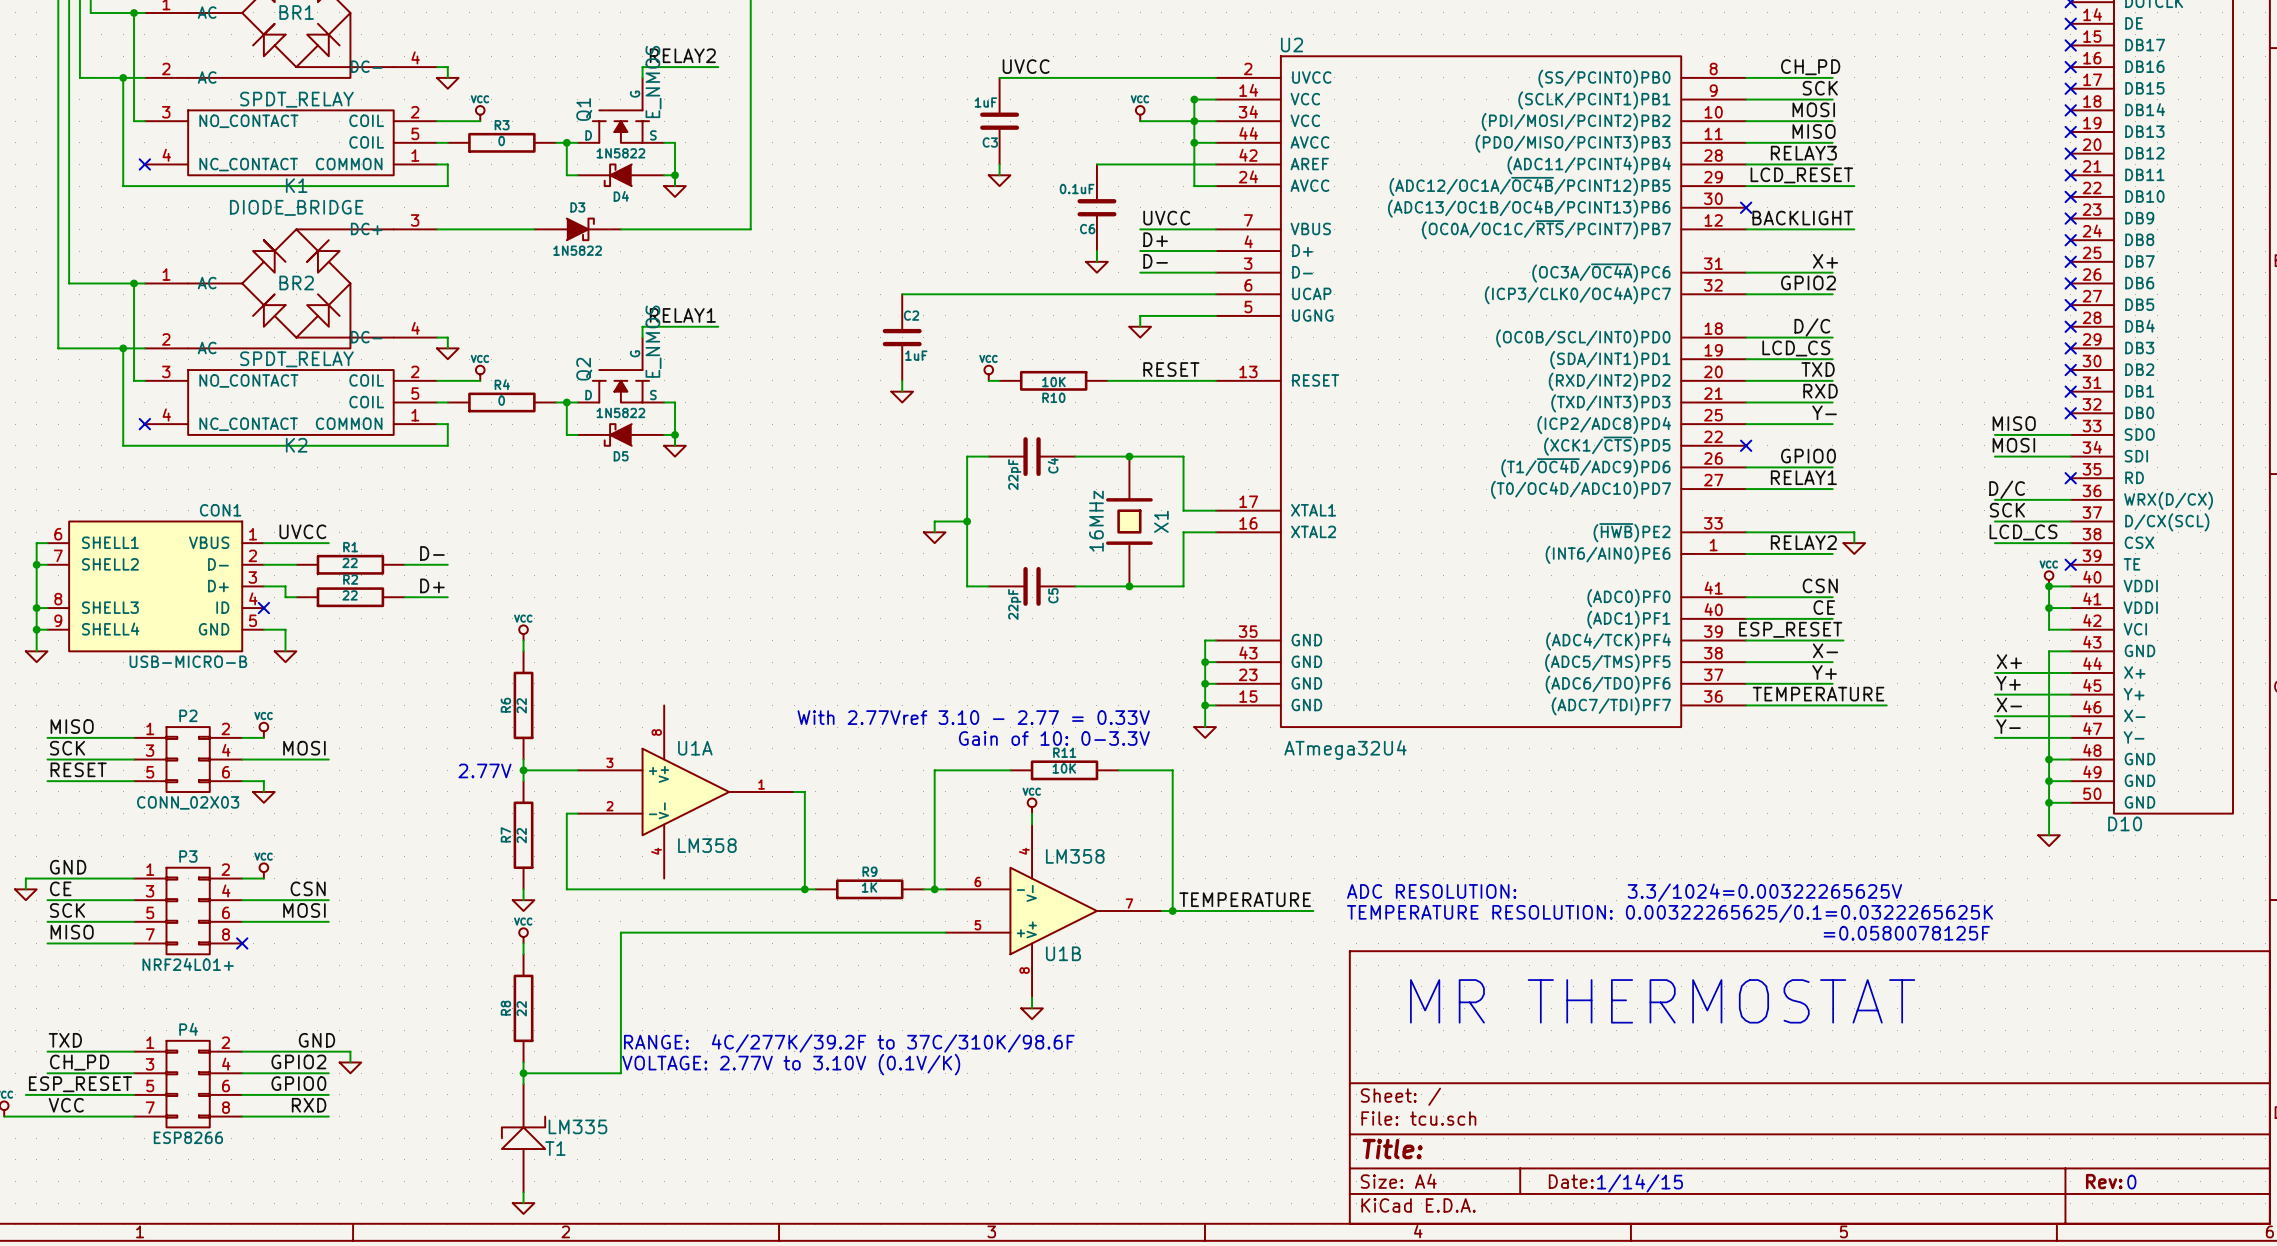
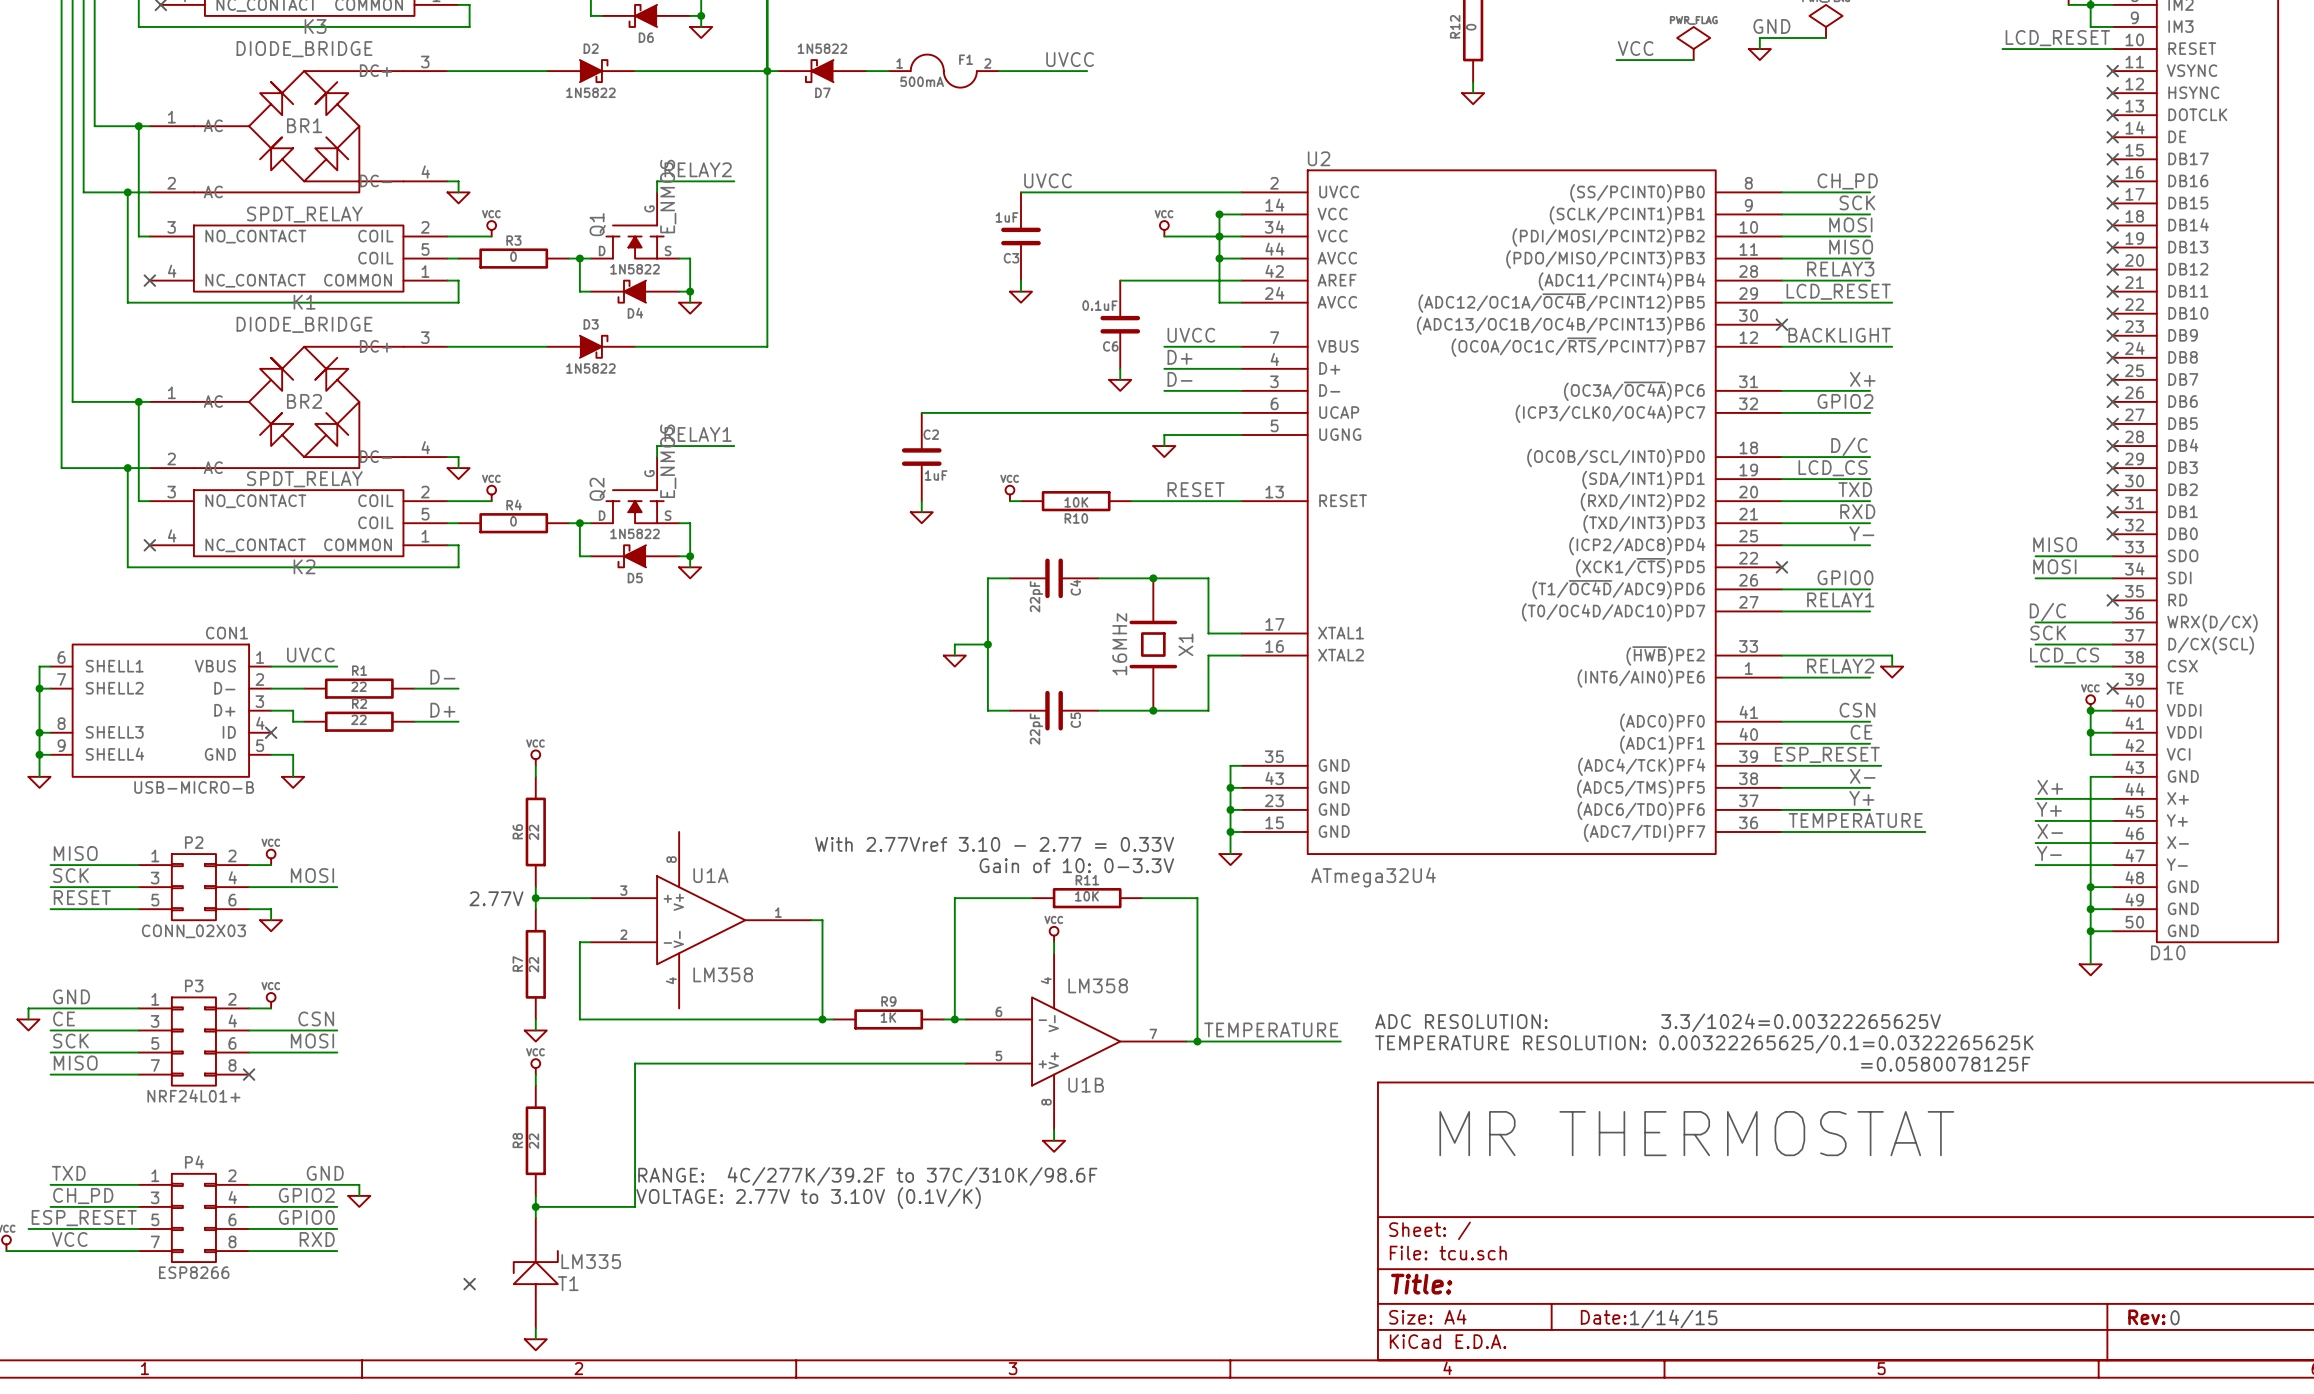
no-connect mark: none -> (469, 1284)

